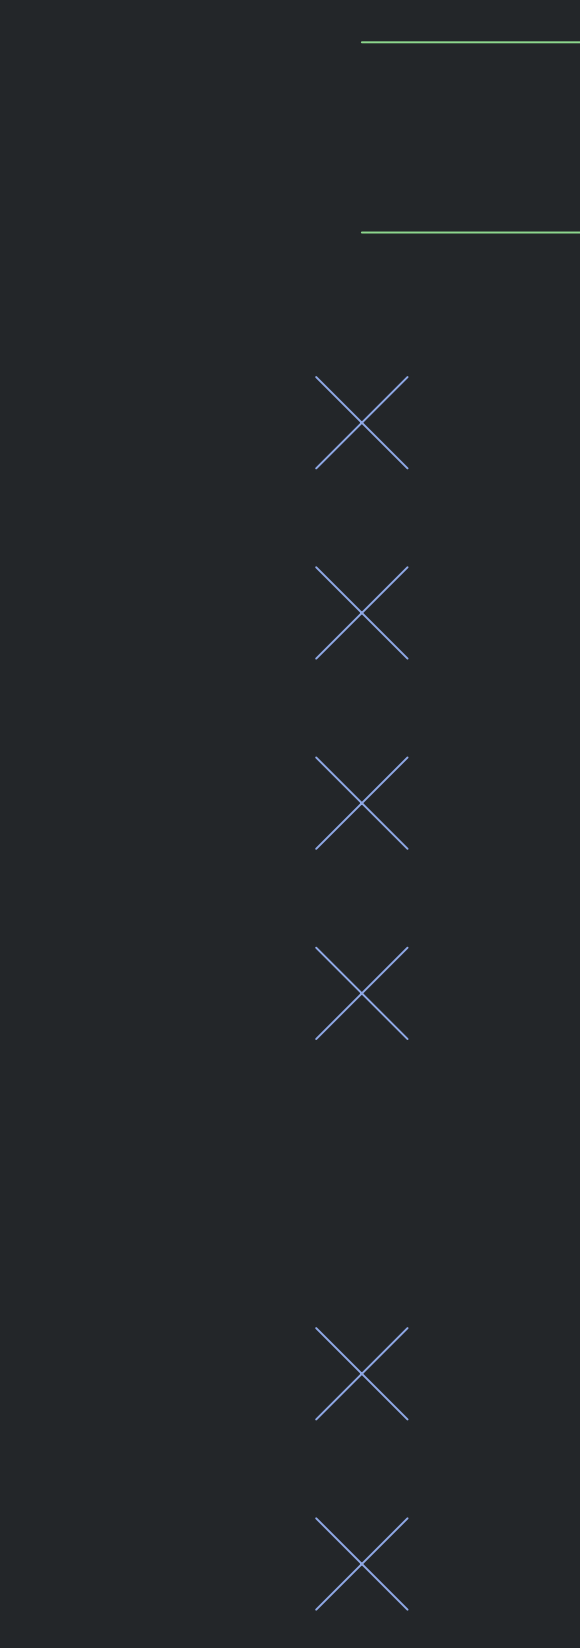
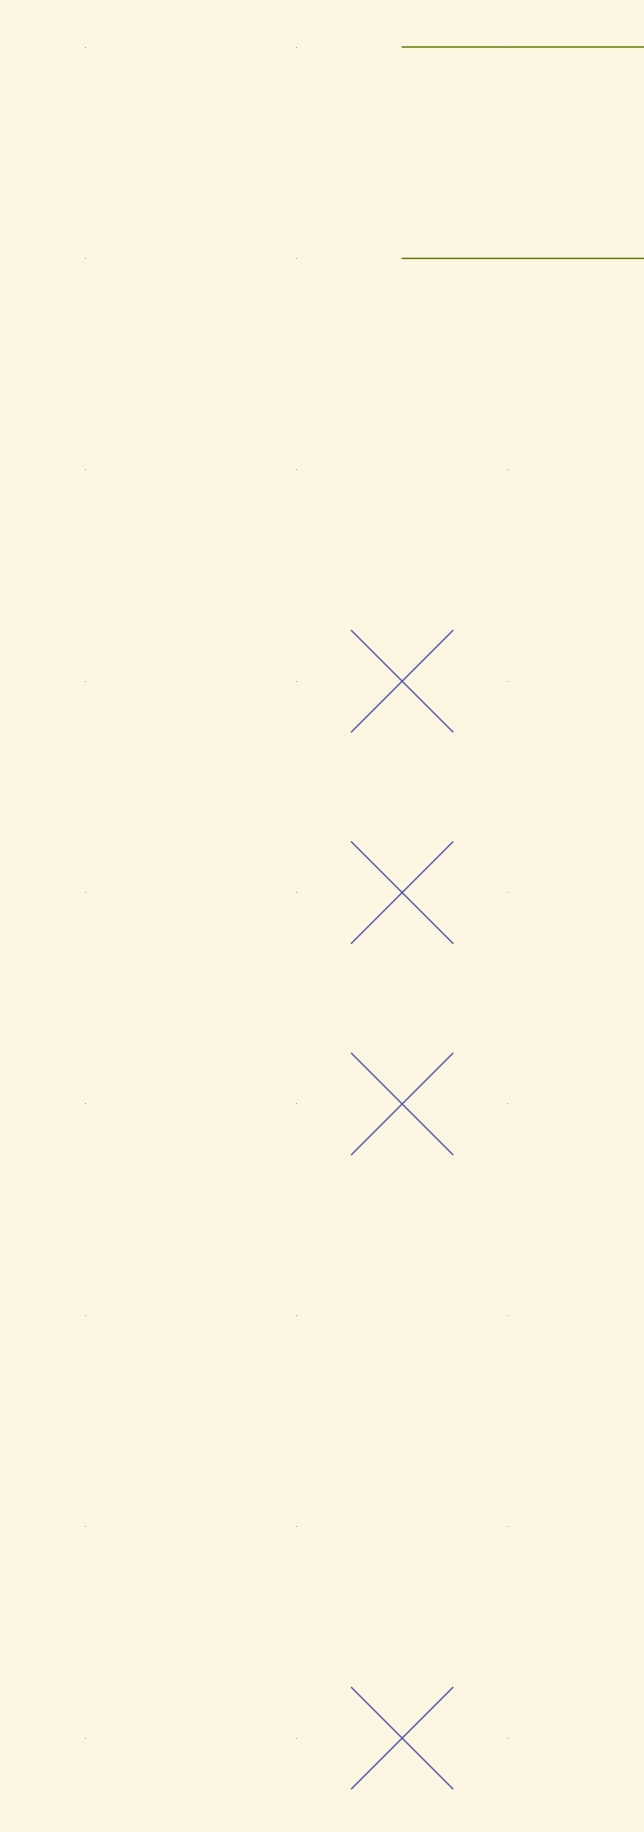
no-connect mark: (361, 422) -> none
no-connect mark: (361, 1373) -> none

